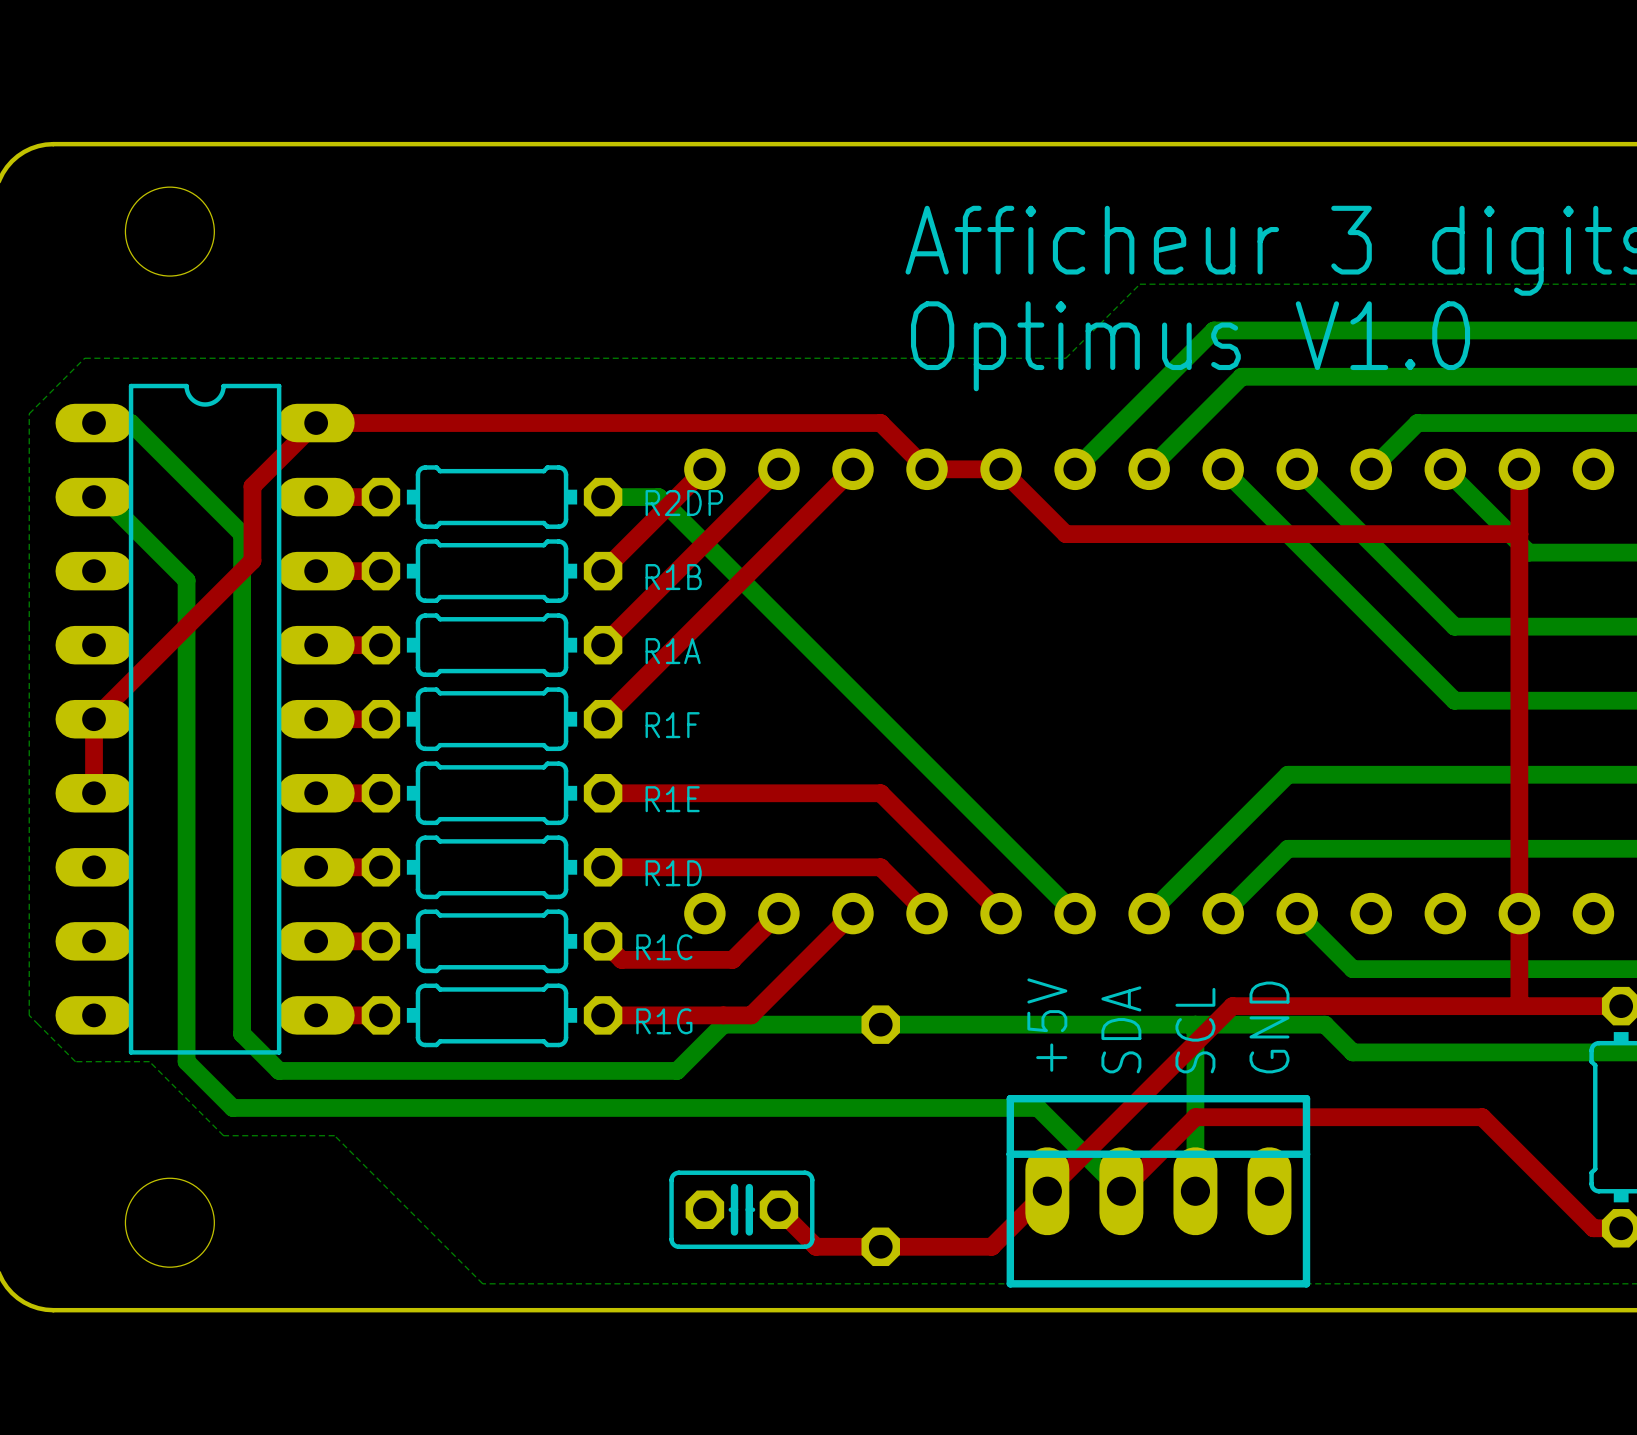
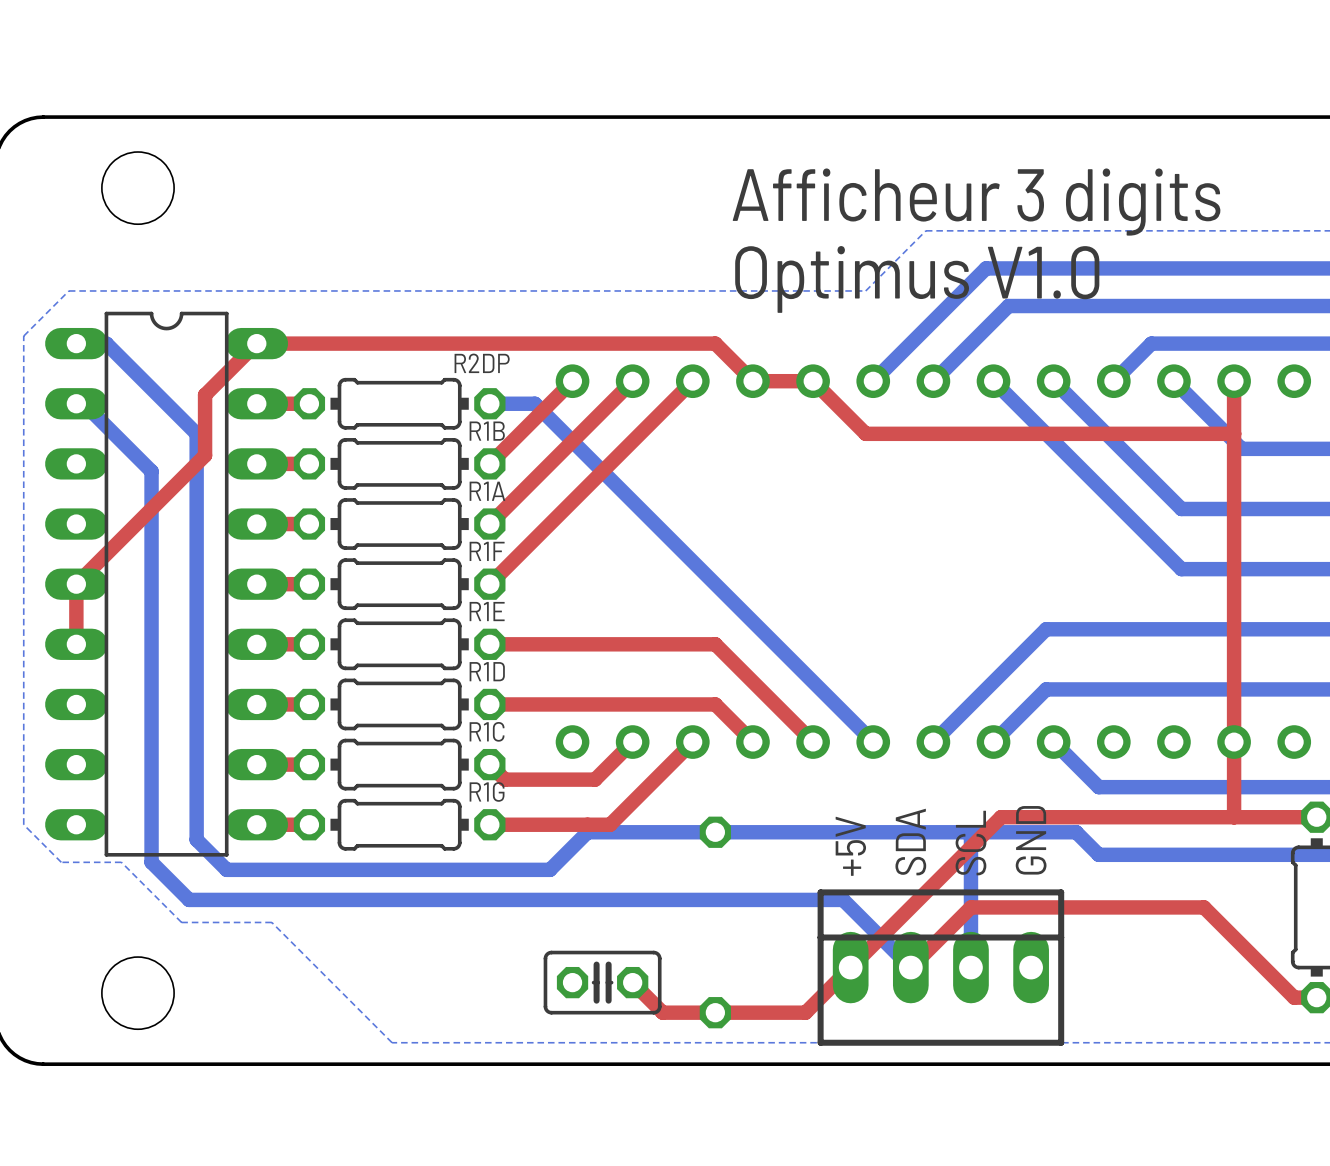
R2DP name position: R2DP (684, 503) -> R2DP (482, 363)
R1B name position: R1B (673, 577) -> R1B (487, 431)
R1A name position: R1A (673, 651) -> R1A (487, 491)
R1F name position: R1F (672, 725) -> R1F (487, 551)
R1E name position: R1E (672, 799) -> R1E (487, 611)
R1D name position: R1D (673, 873) -> R1D (487, 671)
R1C name position: R1C (664, 947) -> R1C (487, 731)
R1G name position: R1G (664, 1021) -> R1G (487, 791)

